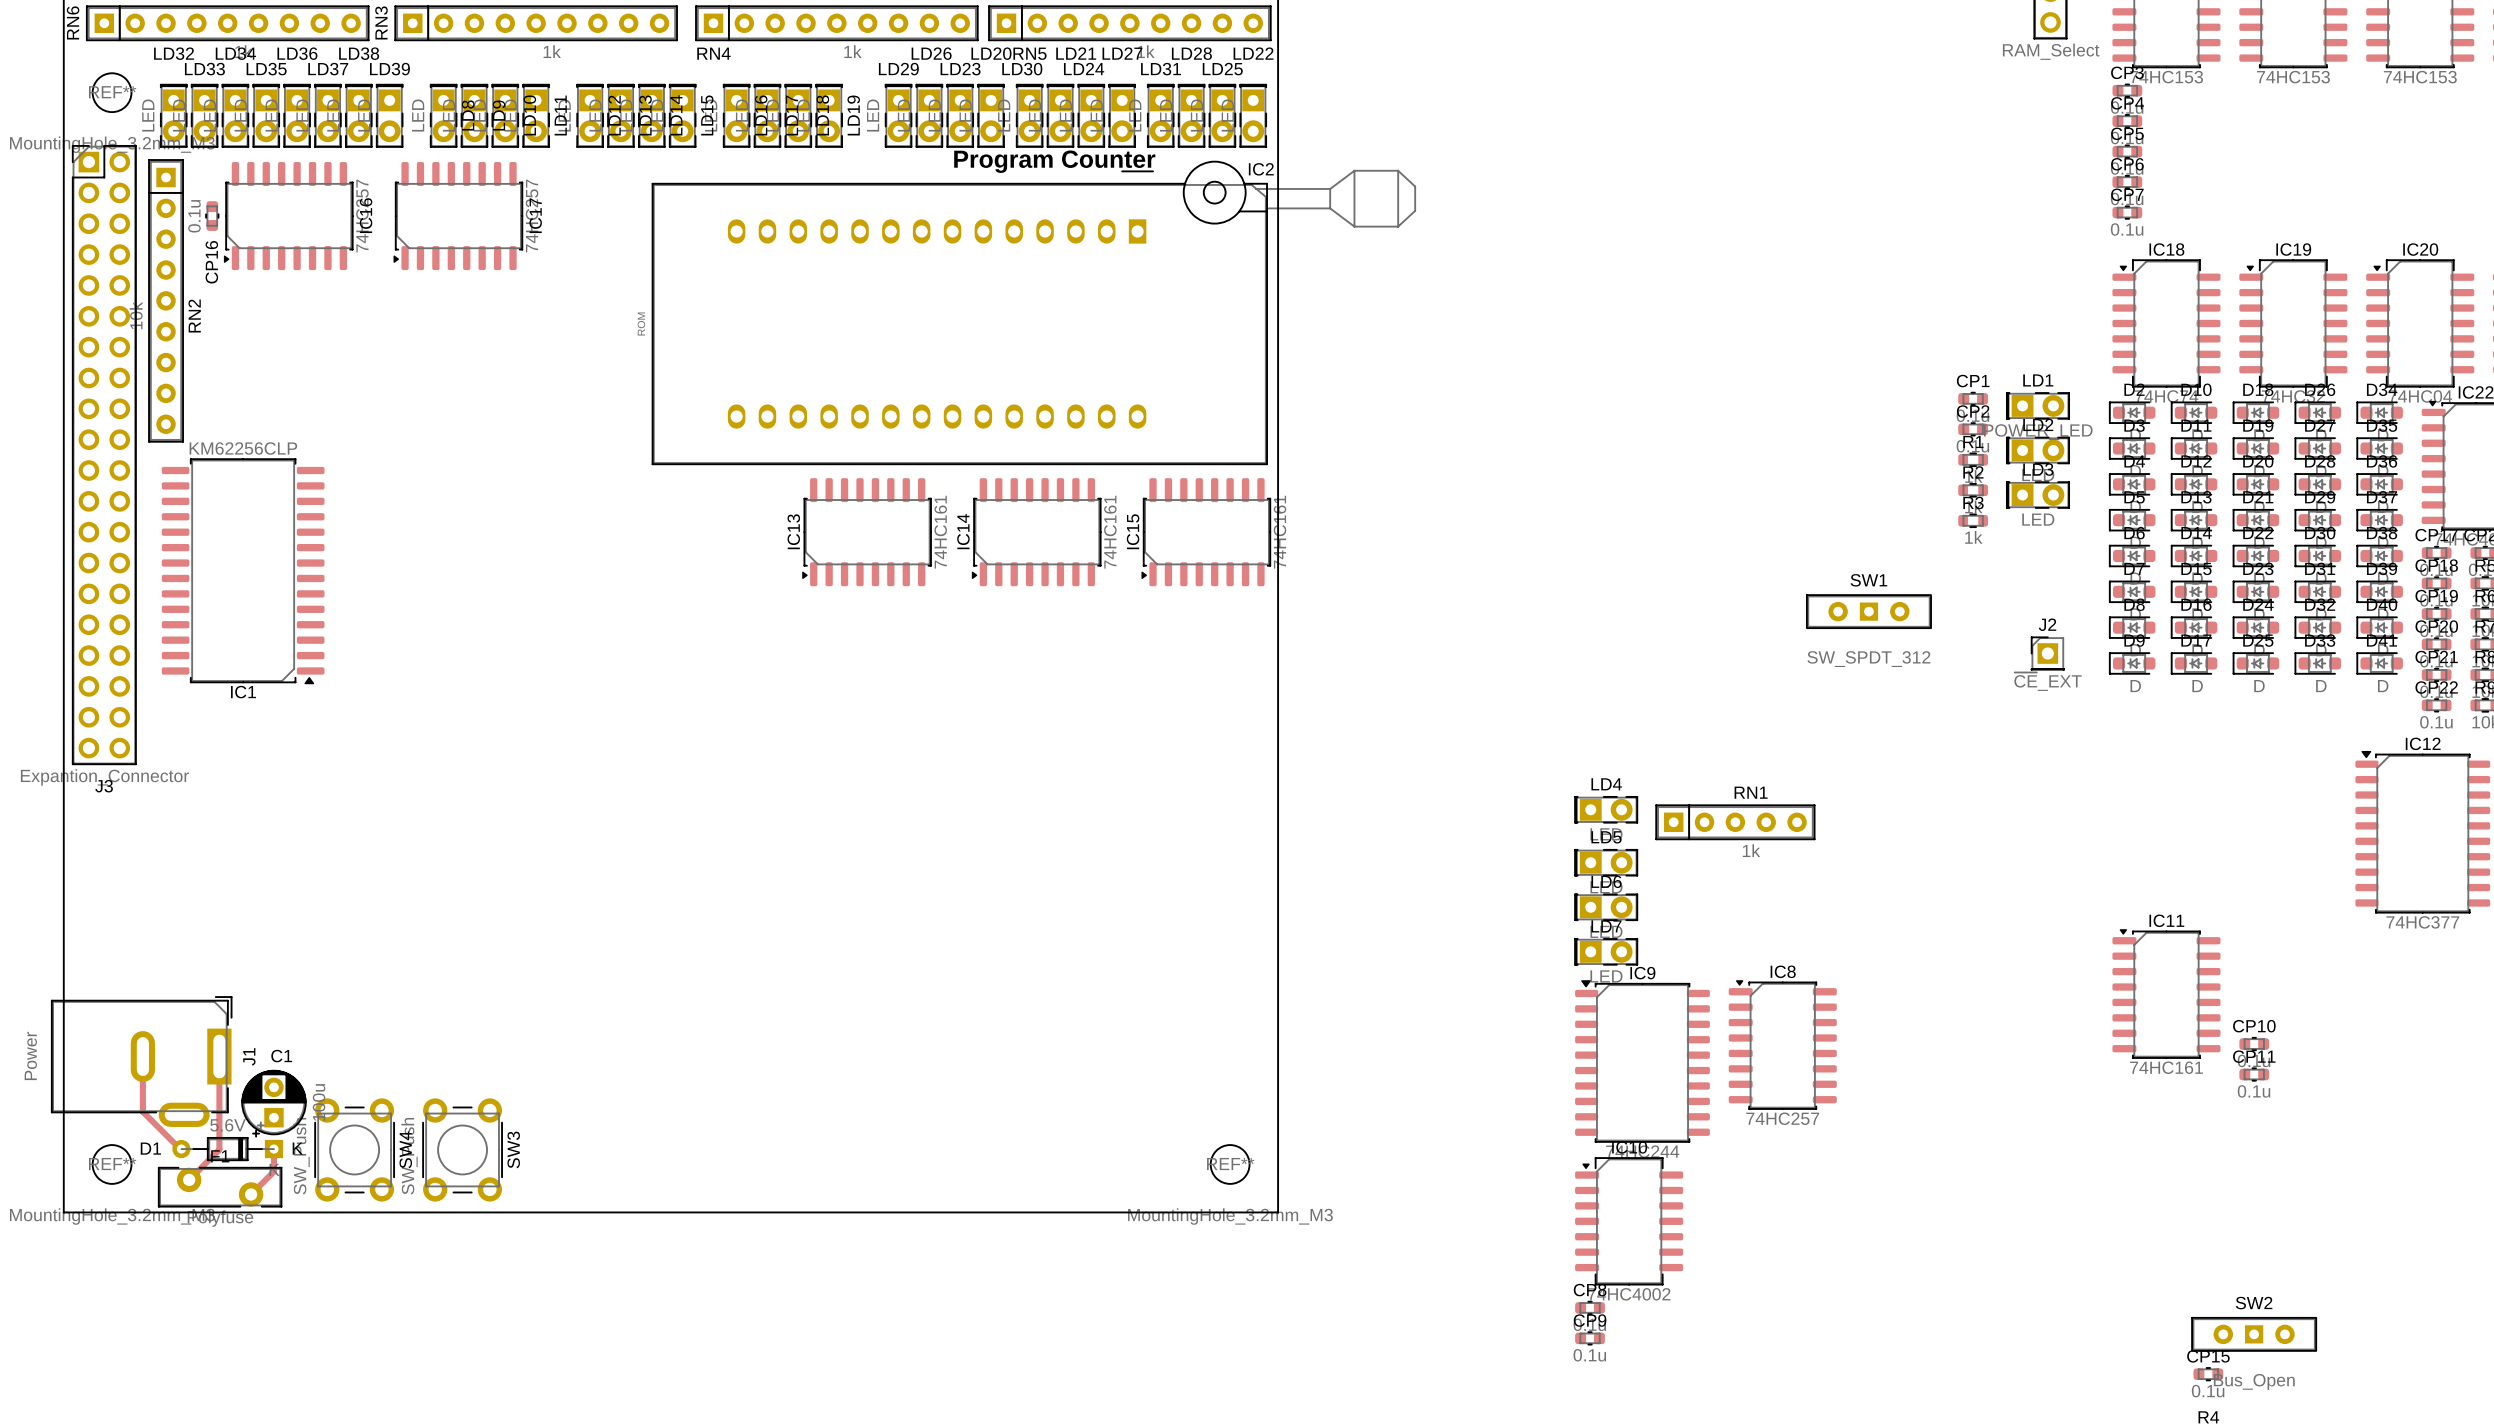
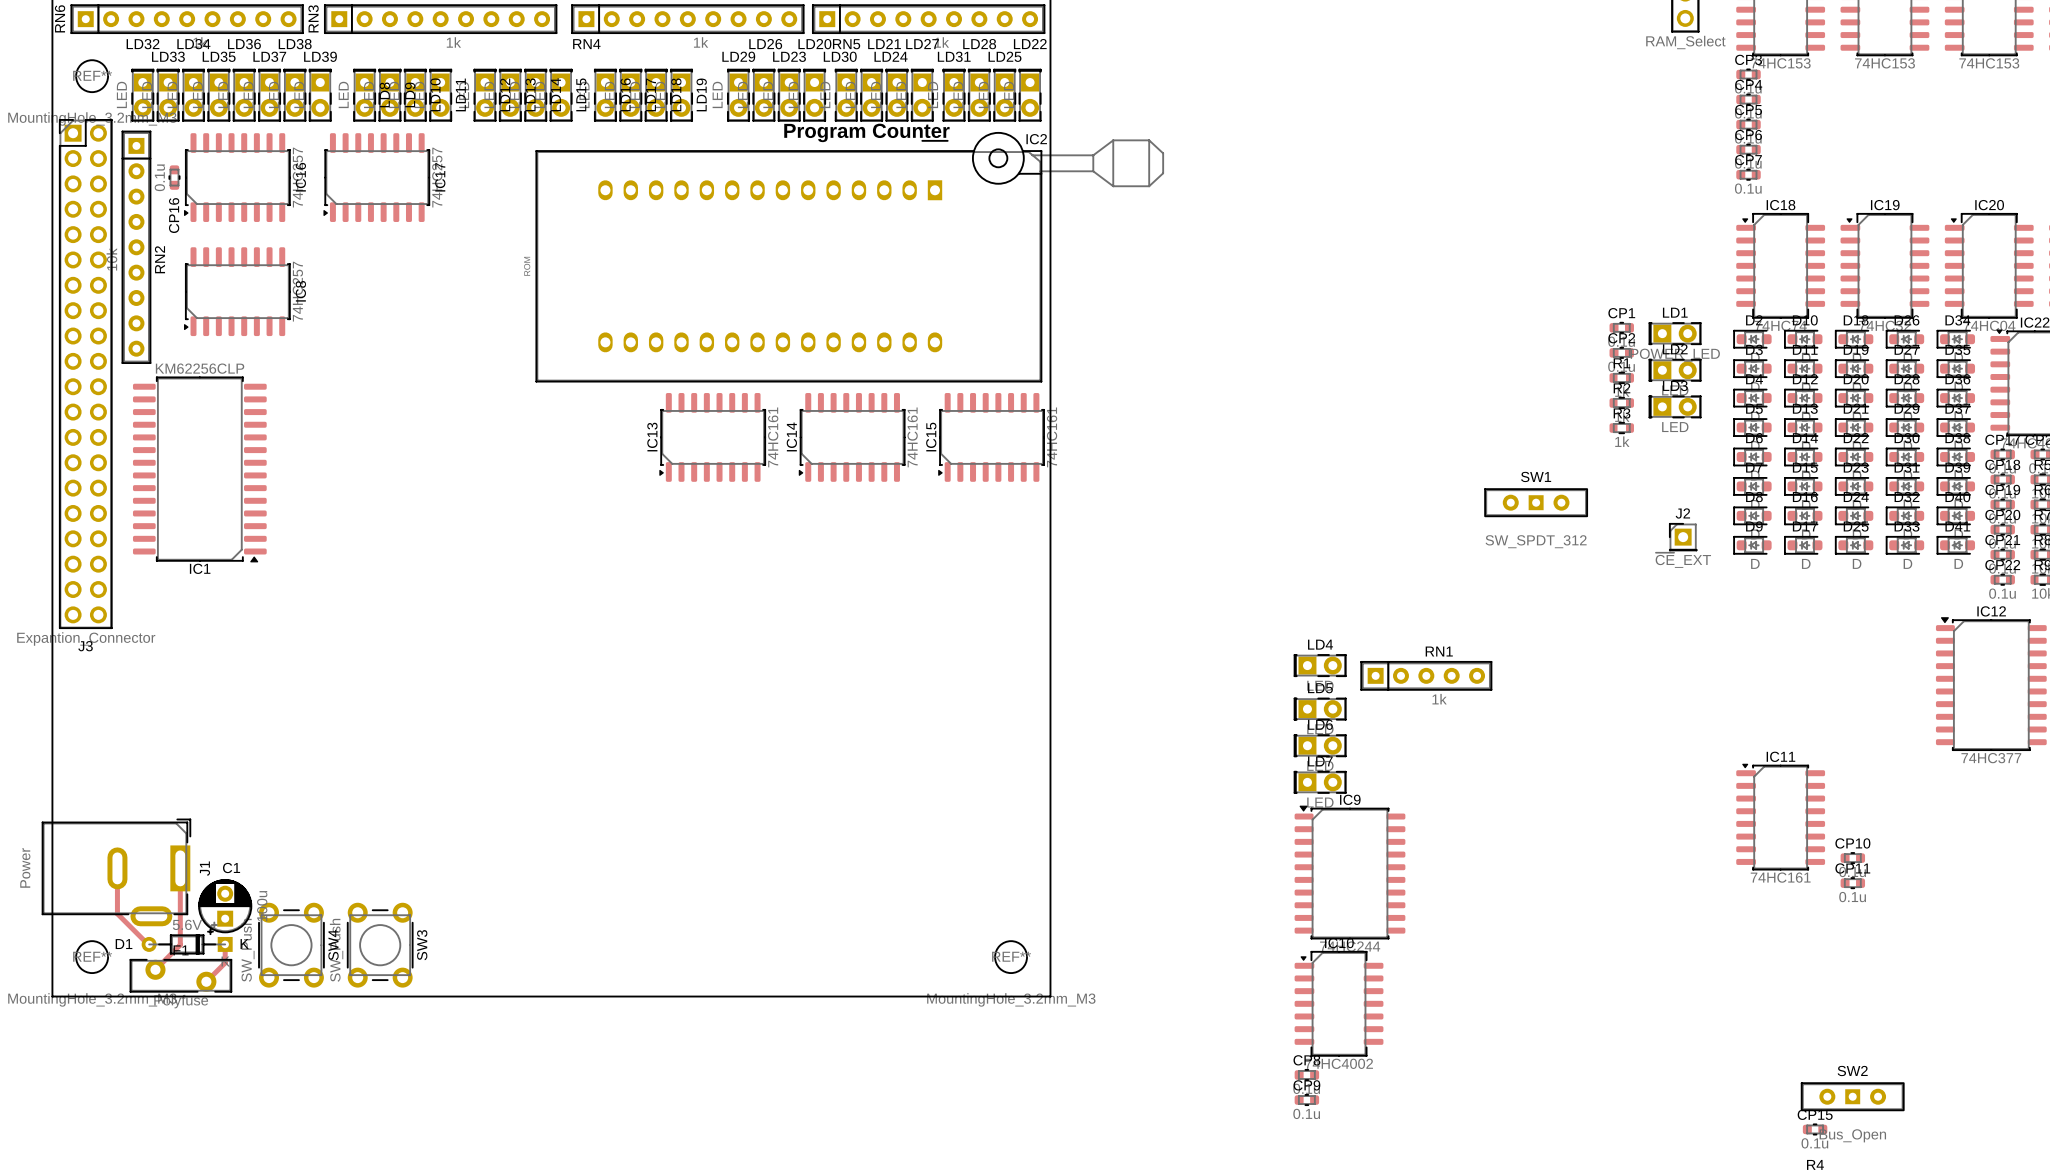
IC8 name position: IC8 (1783, 971) -> IC8 (300, 291)
IC8 rotation: 0° (1782, 1044) -> 90° counterclockwise (237, 291)
IC8 position: (1782, 1044) -> (237, 291)

